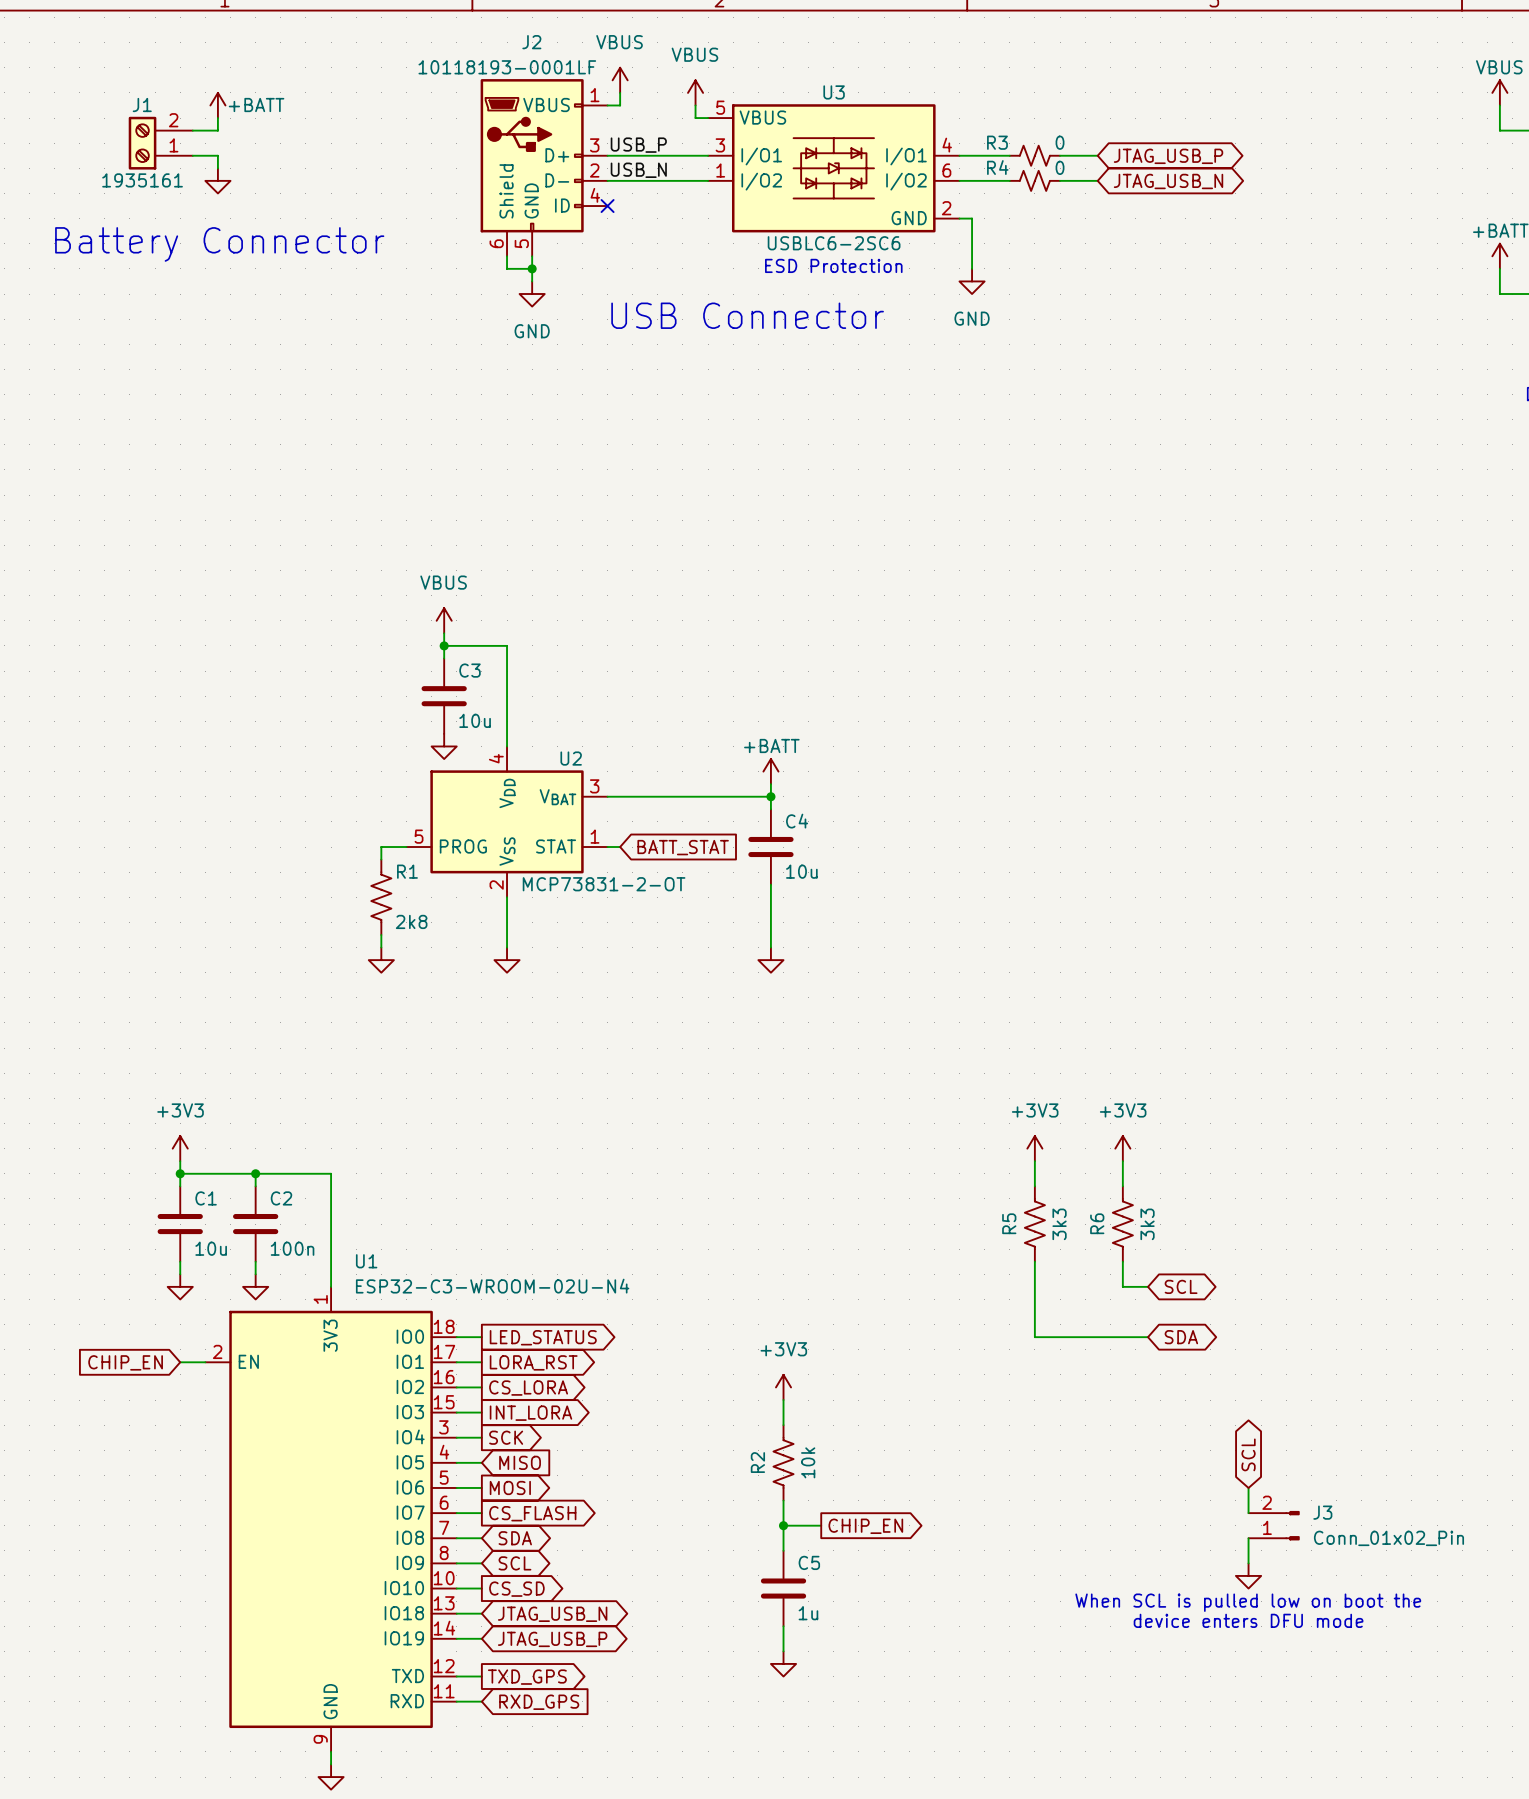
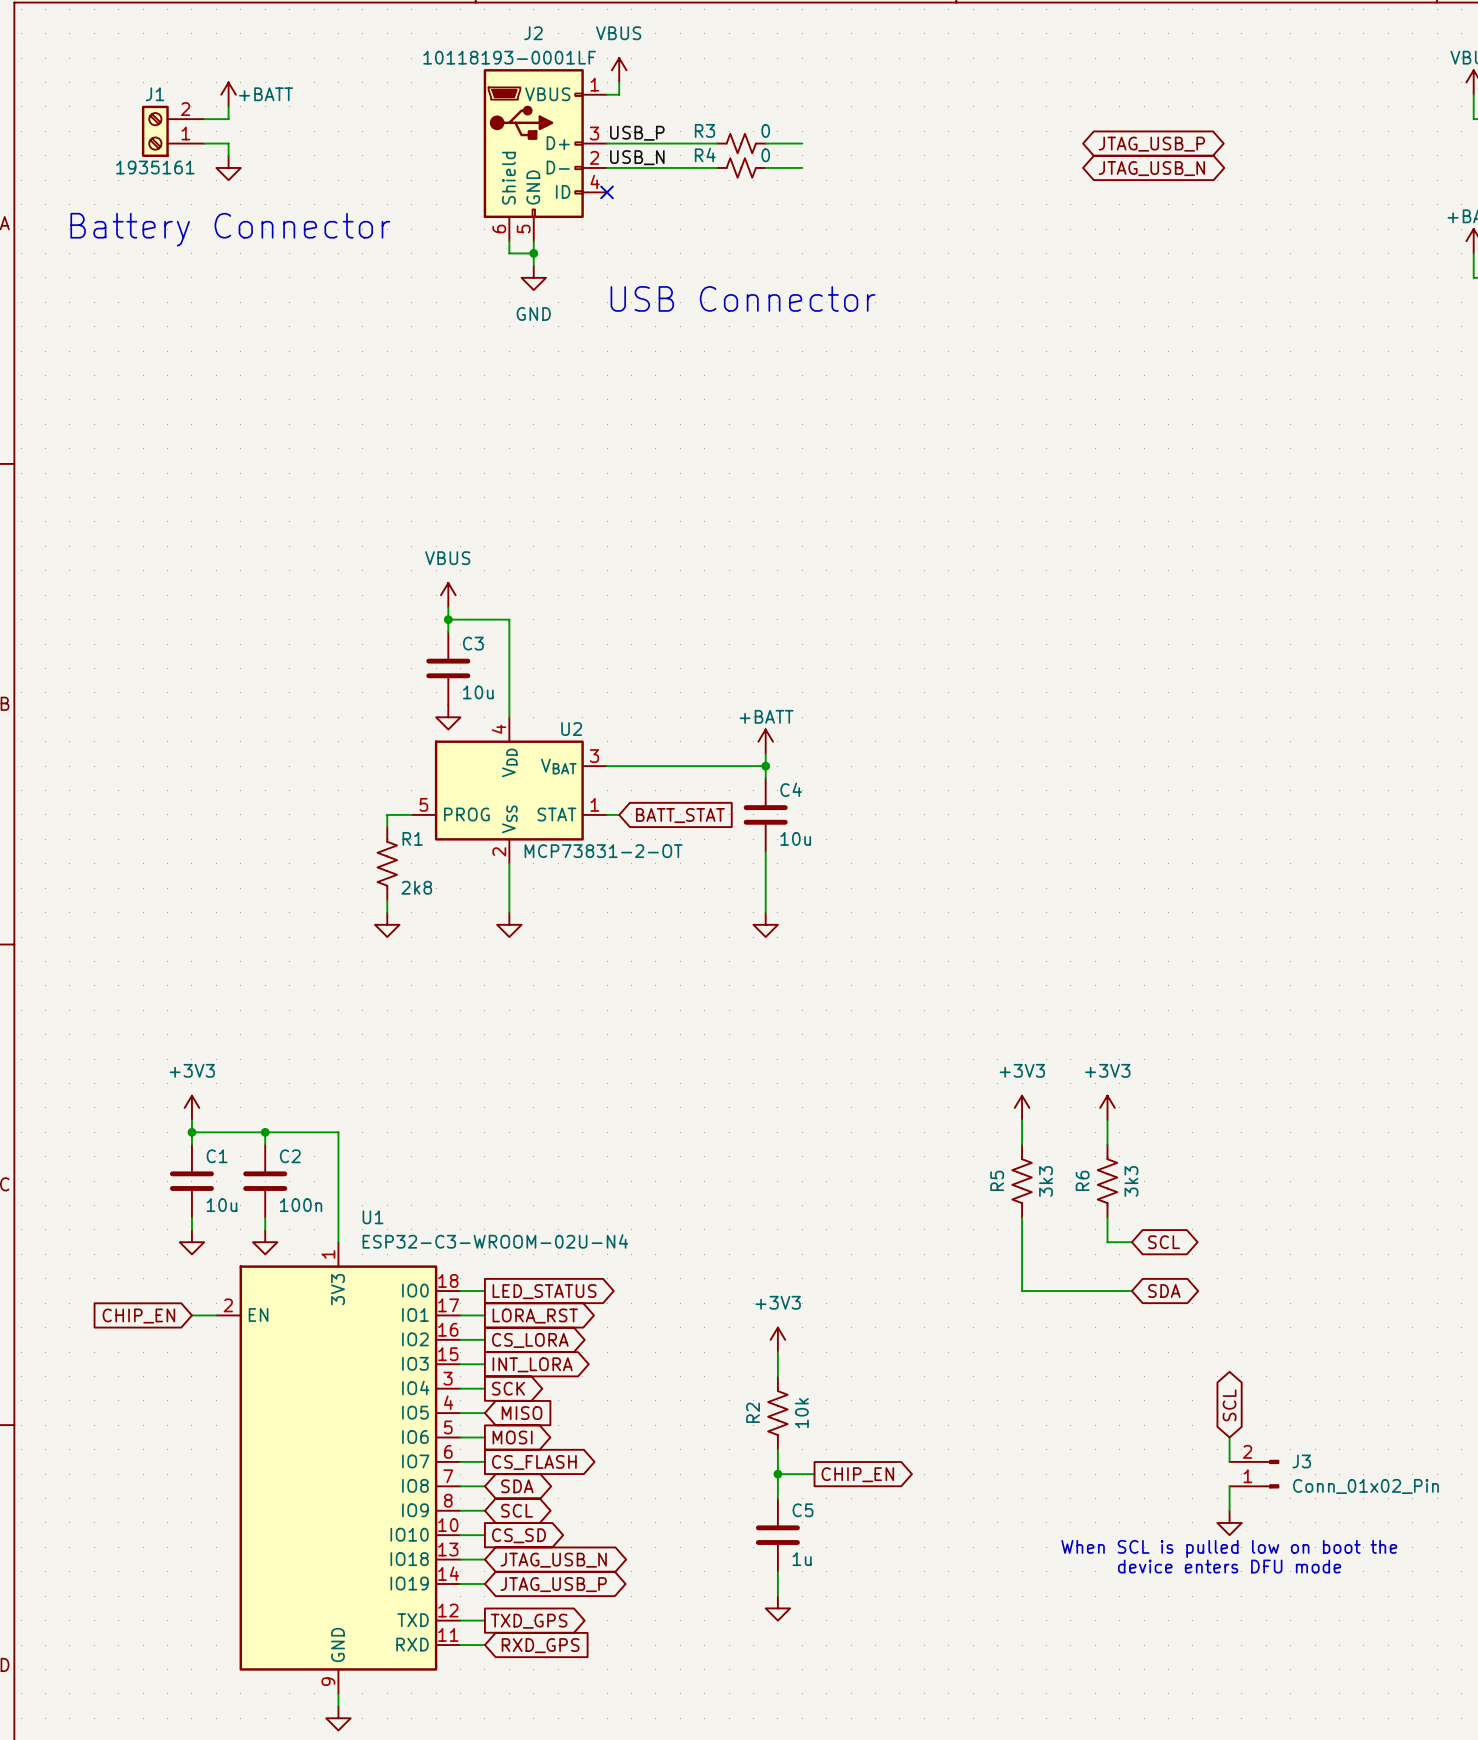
power symbol: VBUS (695, 92) -> none
wire: (695, 105) (695, 118) (708, 118) -> none
wire: (959, 155) (1009, 155) -> none
R3 position: (1034, 155) -> (741, 143)
wire: (1060, 155) (1097, 155) -> none
U3: USBLC6-2SC6 (833, 168) -> none
wire: (959, 180) (1009, 180) -> none
R4 position: (1034, 180) -> (741, 167)
wire: (1060, 180) (1097, 180) -> none
wire: (959, 218) (972, 218) (972, 268) -> none
text: ESD Protection (833, 265) -> none
power symbol: GND (972, 281) -> none

